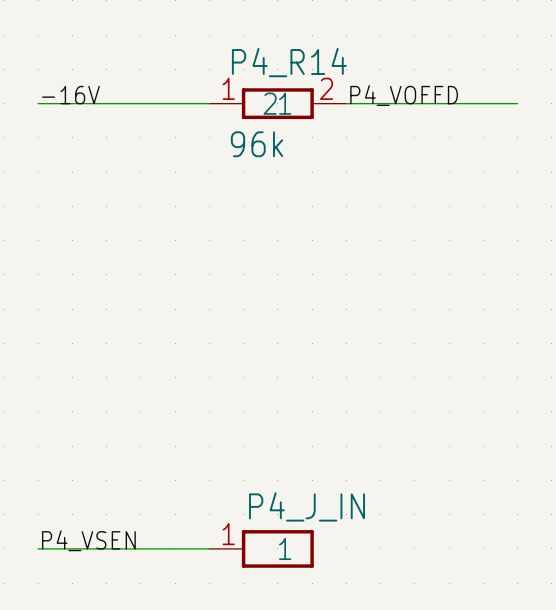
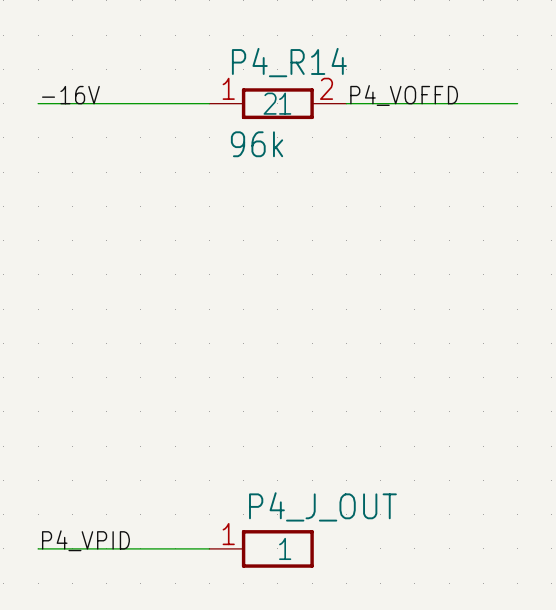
P4_J_IN name: P4_J_IN (307, 506) -> P4_J_OUT (322, 506)
label: P4_VSEN (88, 540) -> P4_VPID (85, 540)

